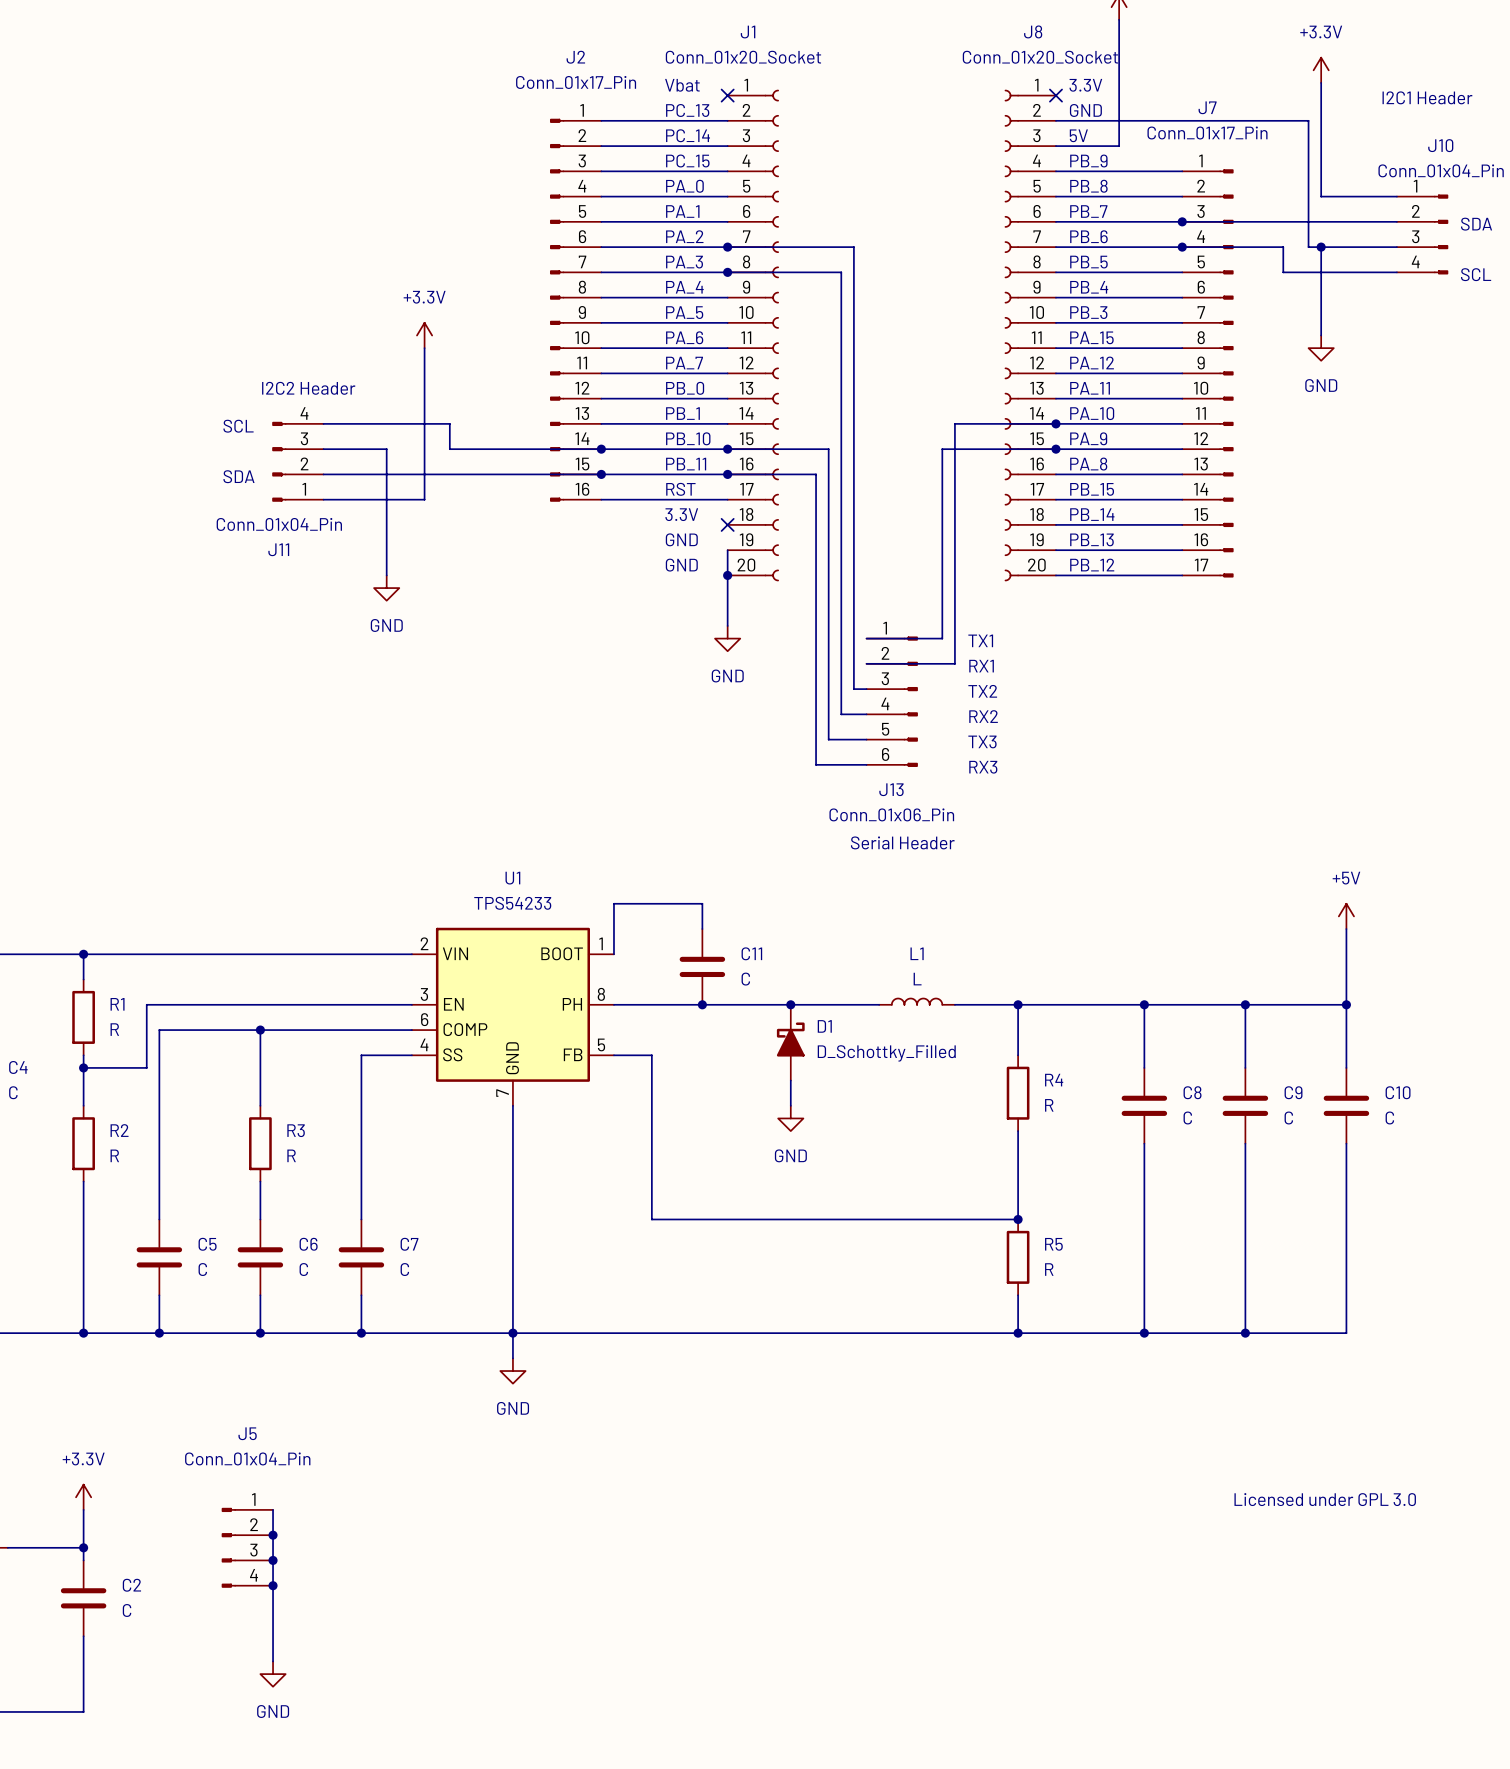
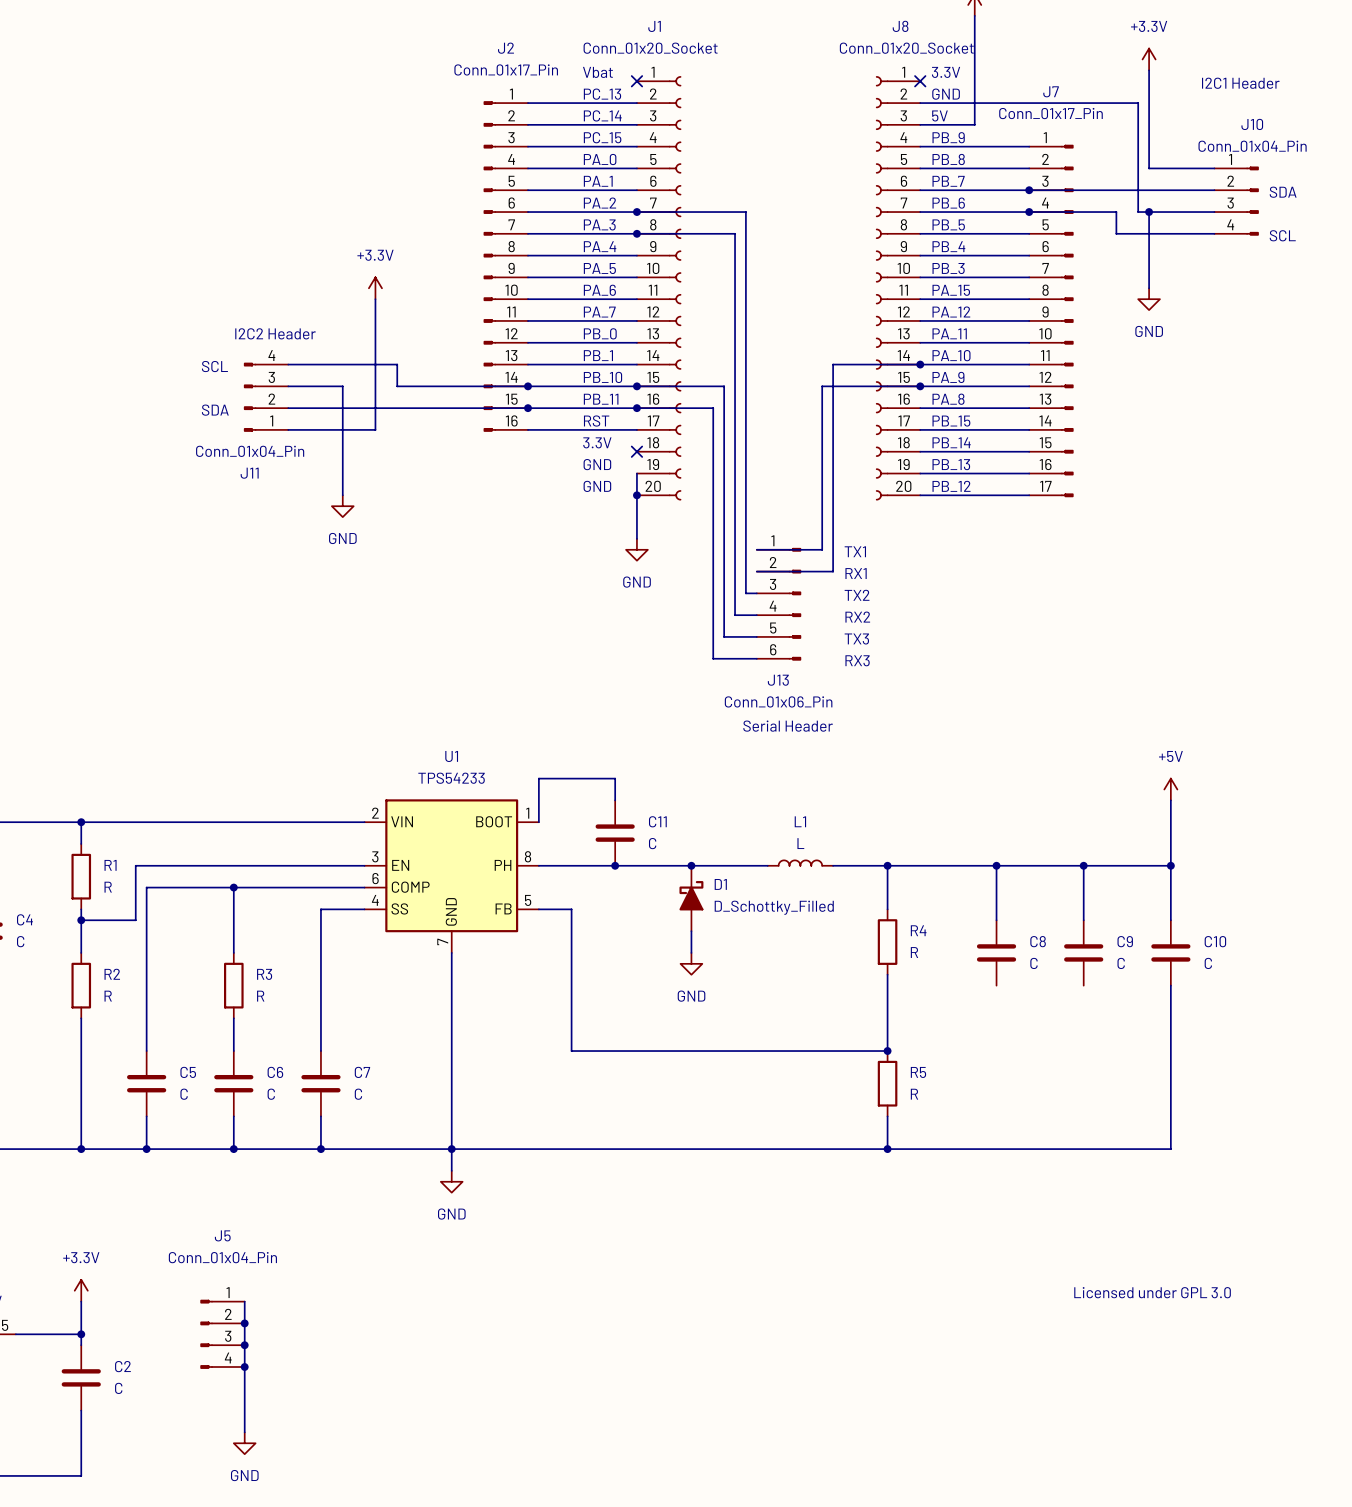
wire: (1144, 1143) (1144, 1333) -> none
wire: (1245, 1143) (1245, 1333) -> none
junction: (1144, 1333) -> none
junction: (1245, 1333) -> none

